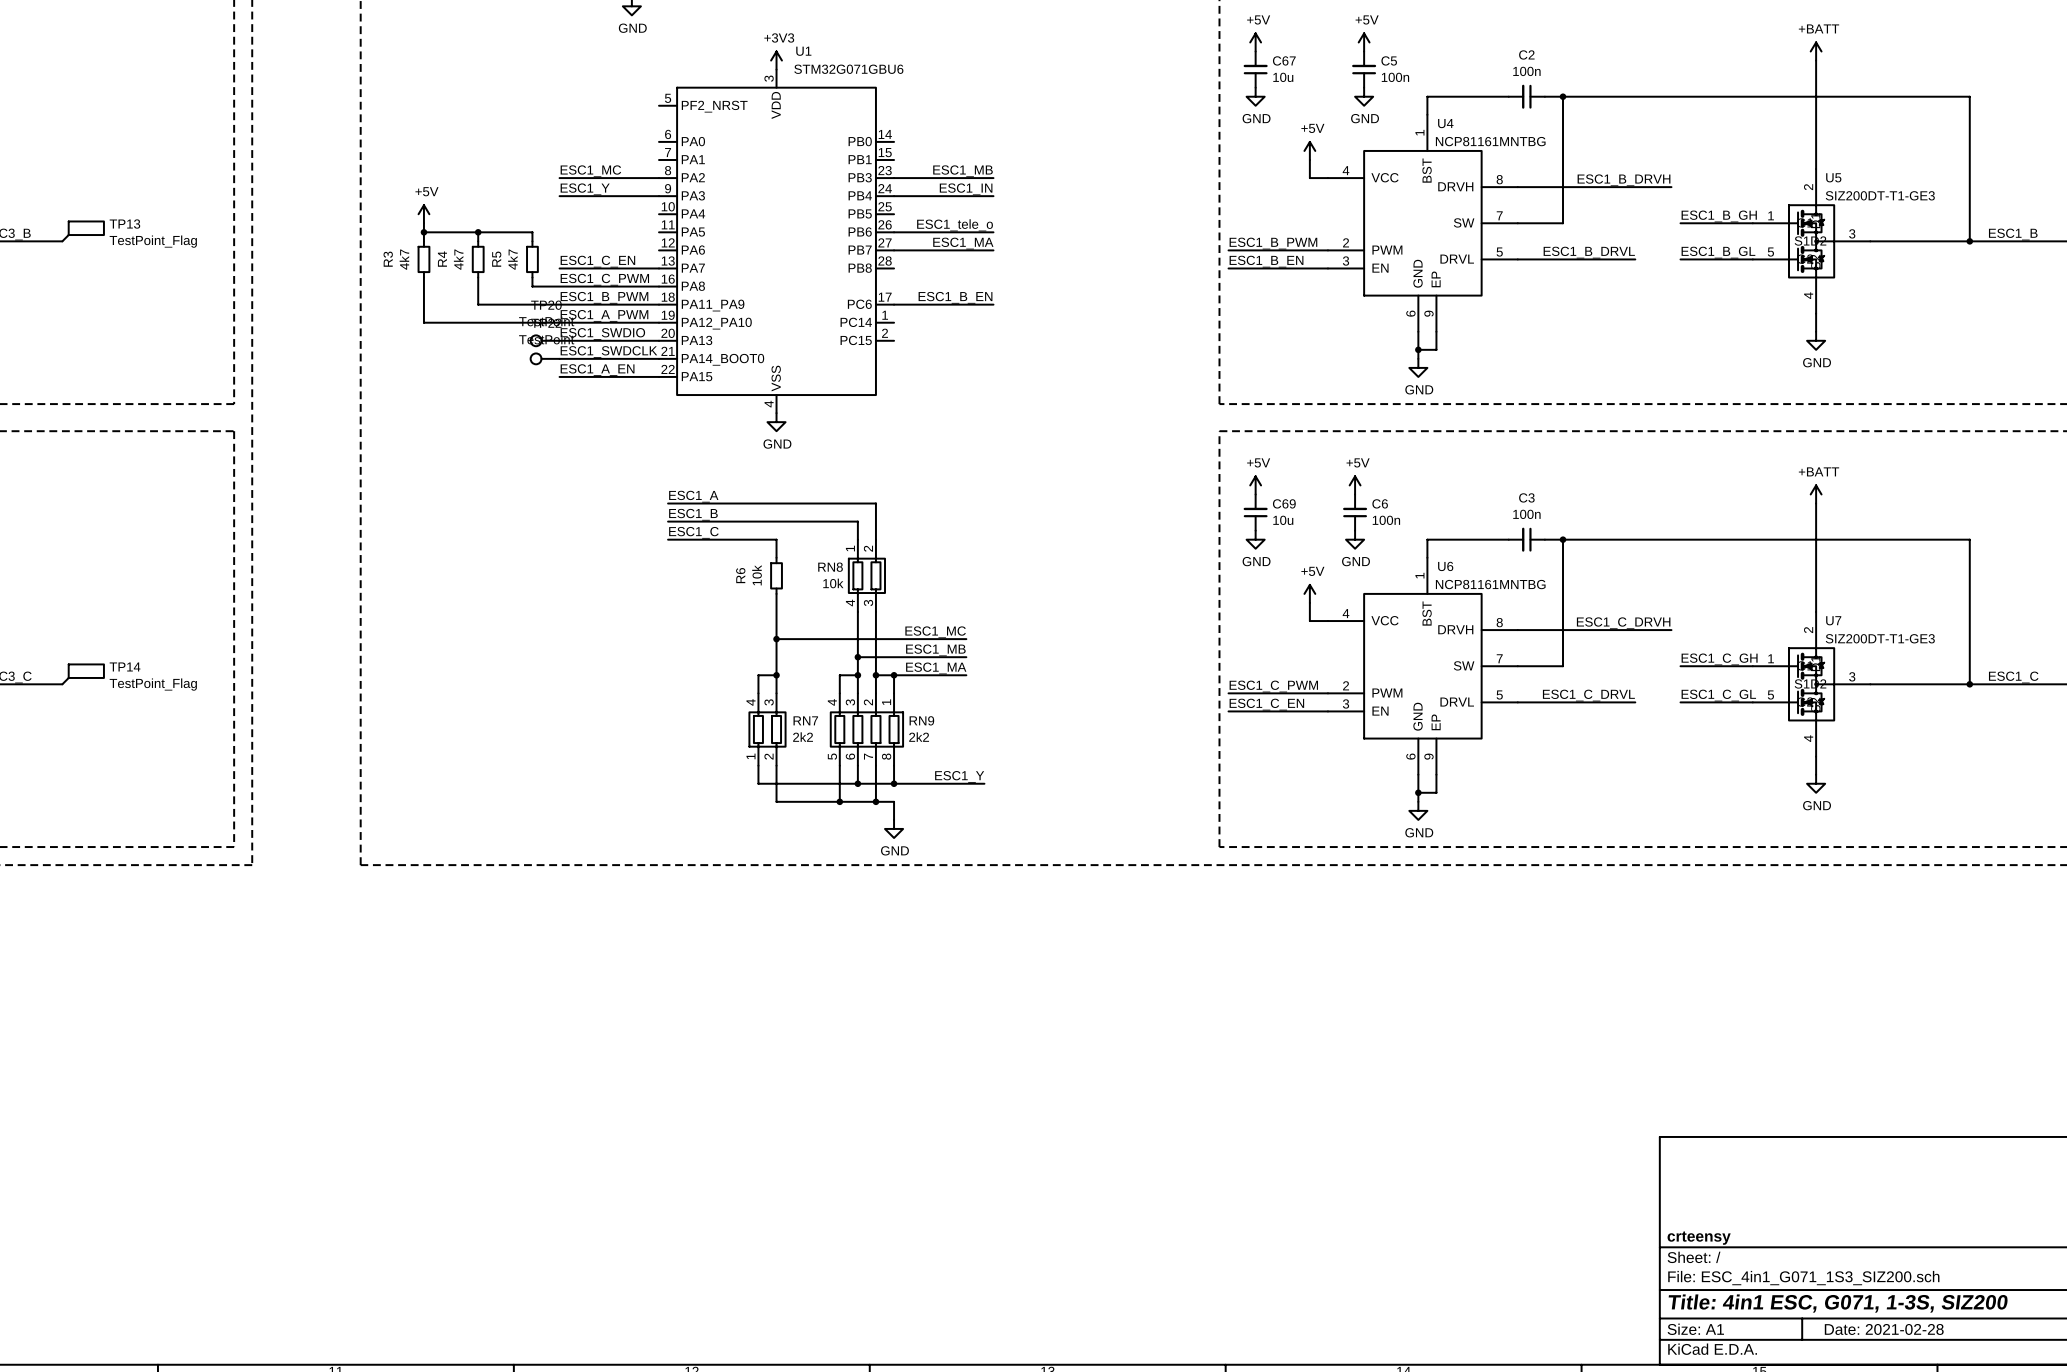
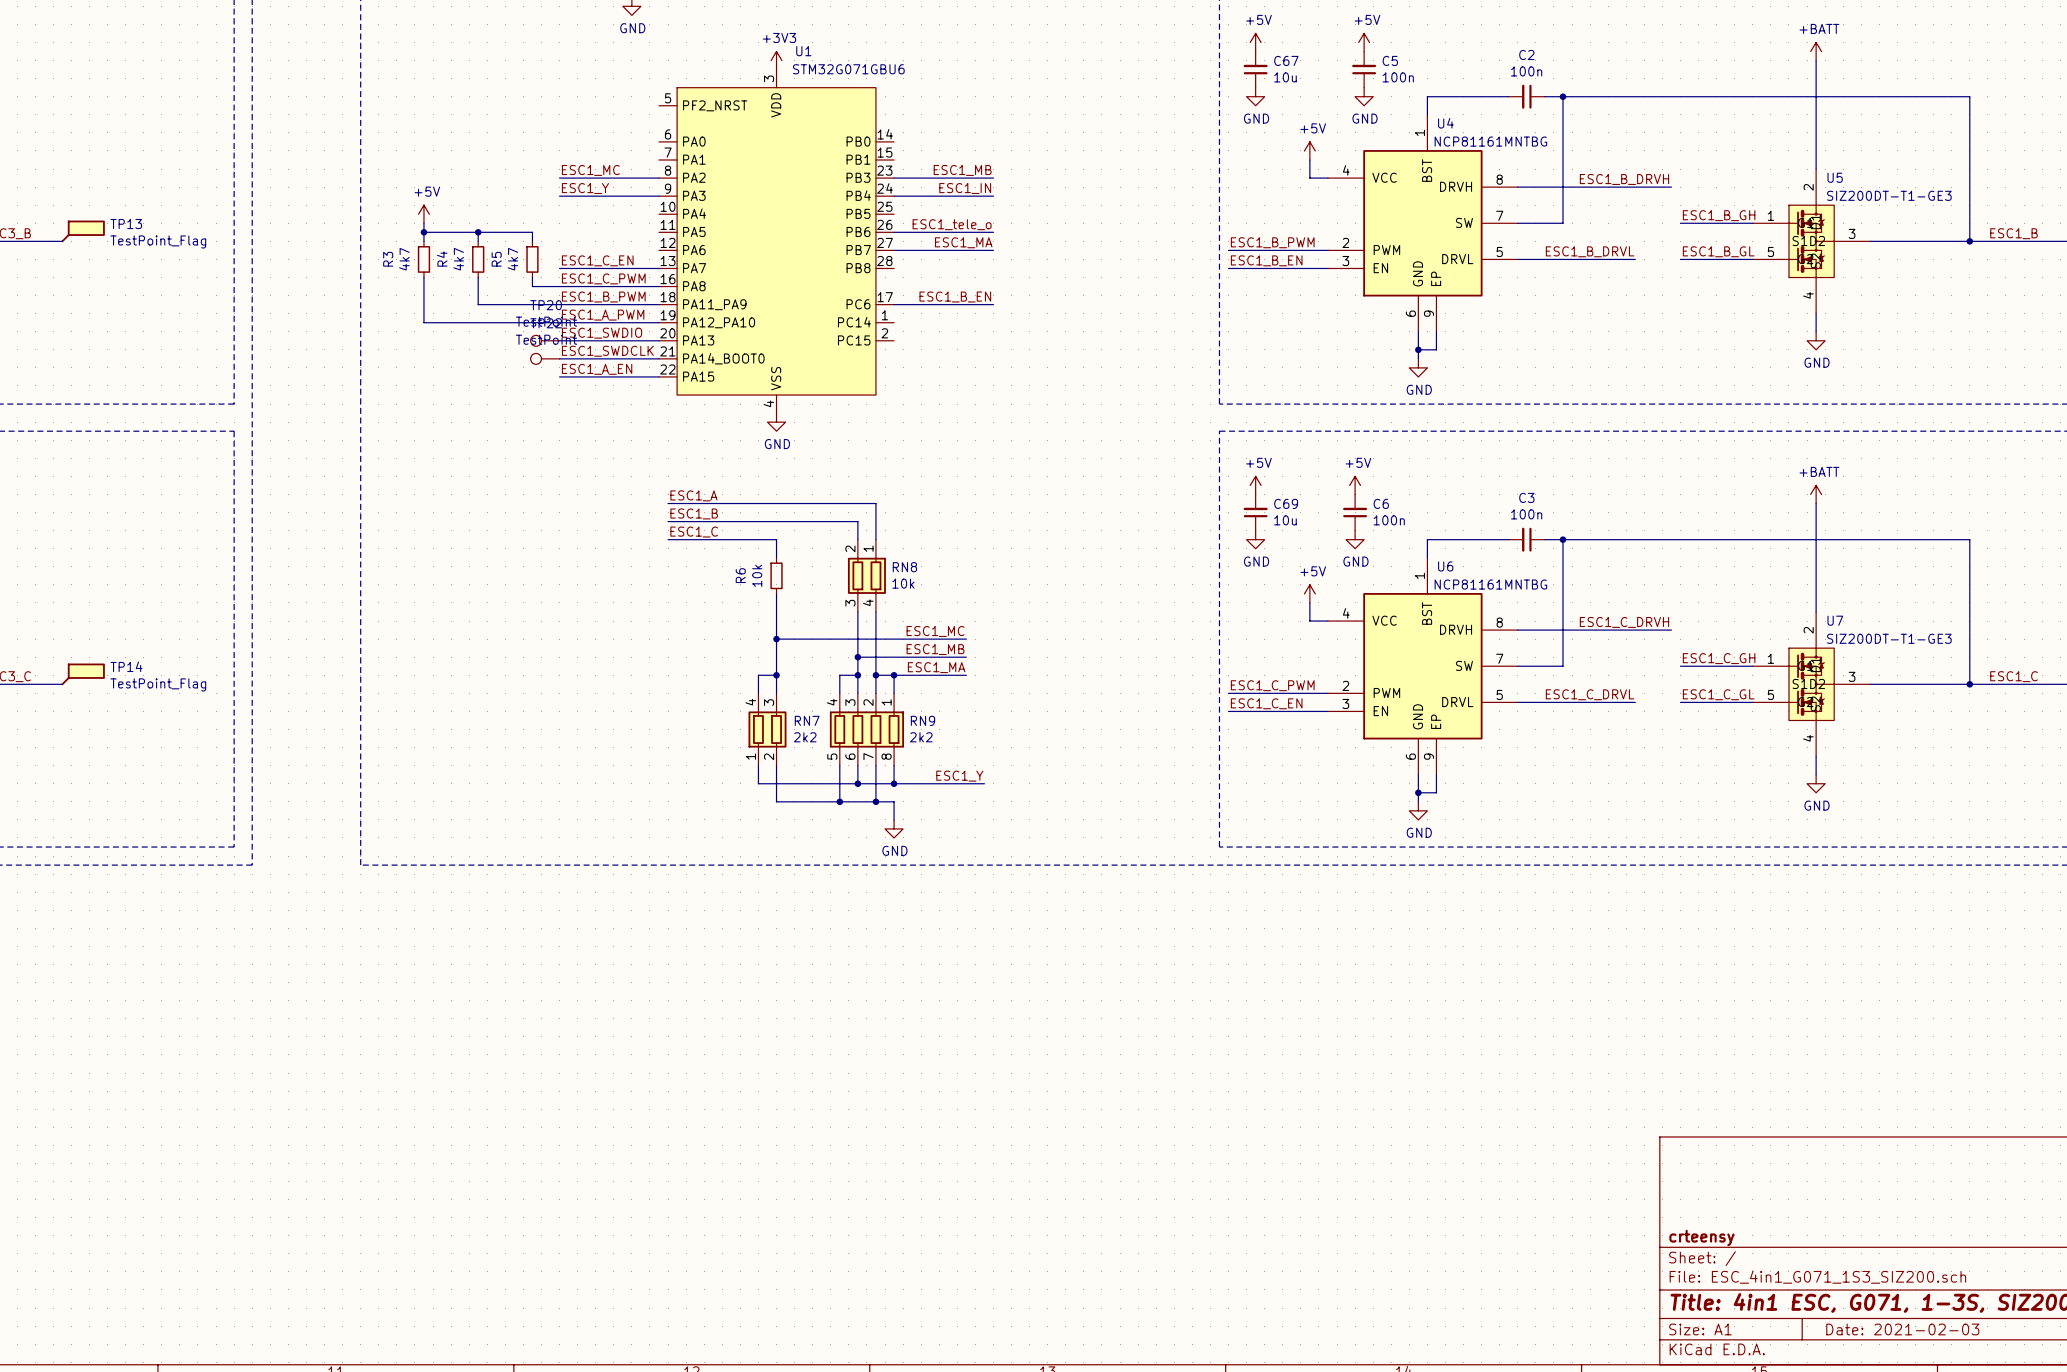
RN8 flip: as is (866, 575) -> left-right (866, 575)
title block: Date: 2021-02-28 (1884, 1329) -> Date: 2021-02-03 (1902, 1329)

